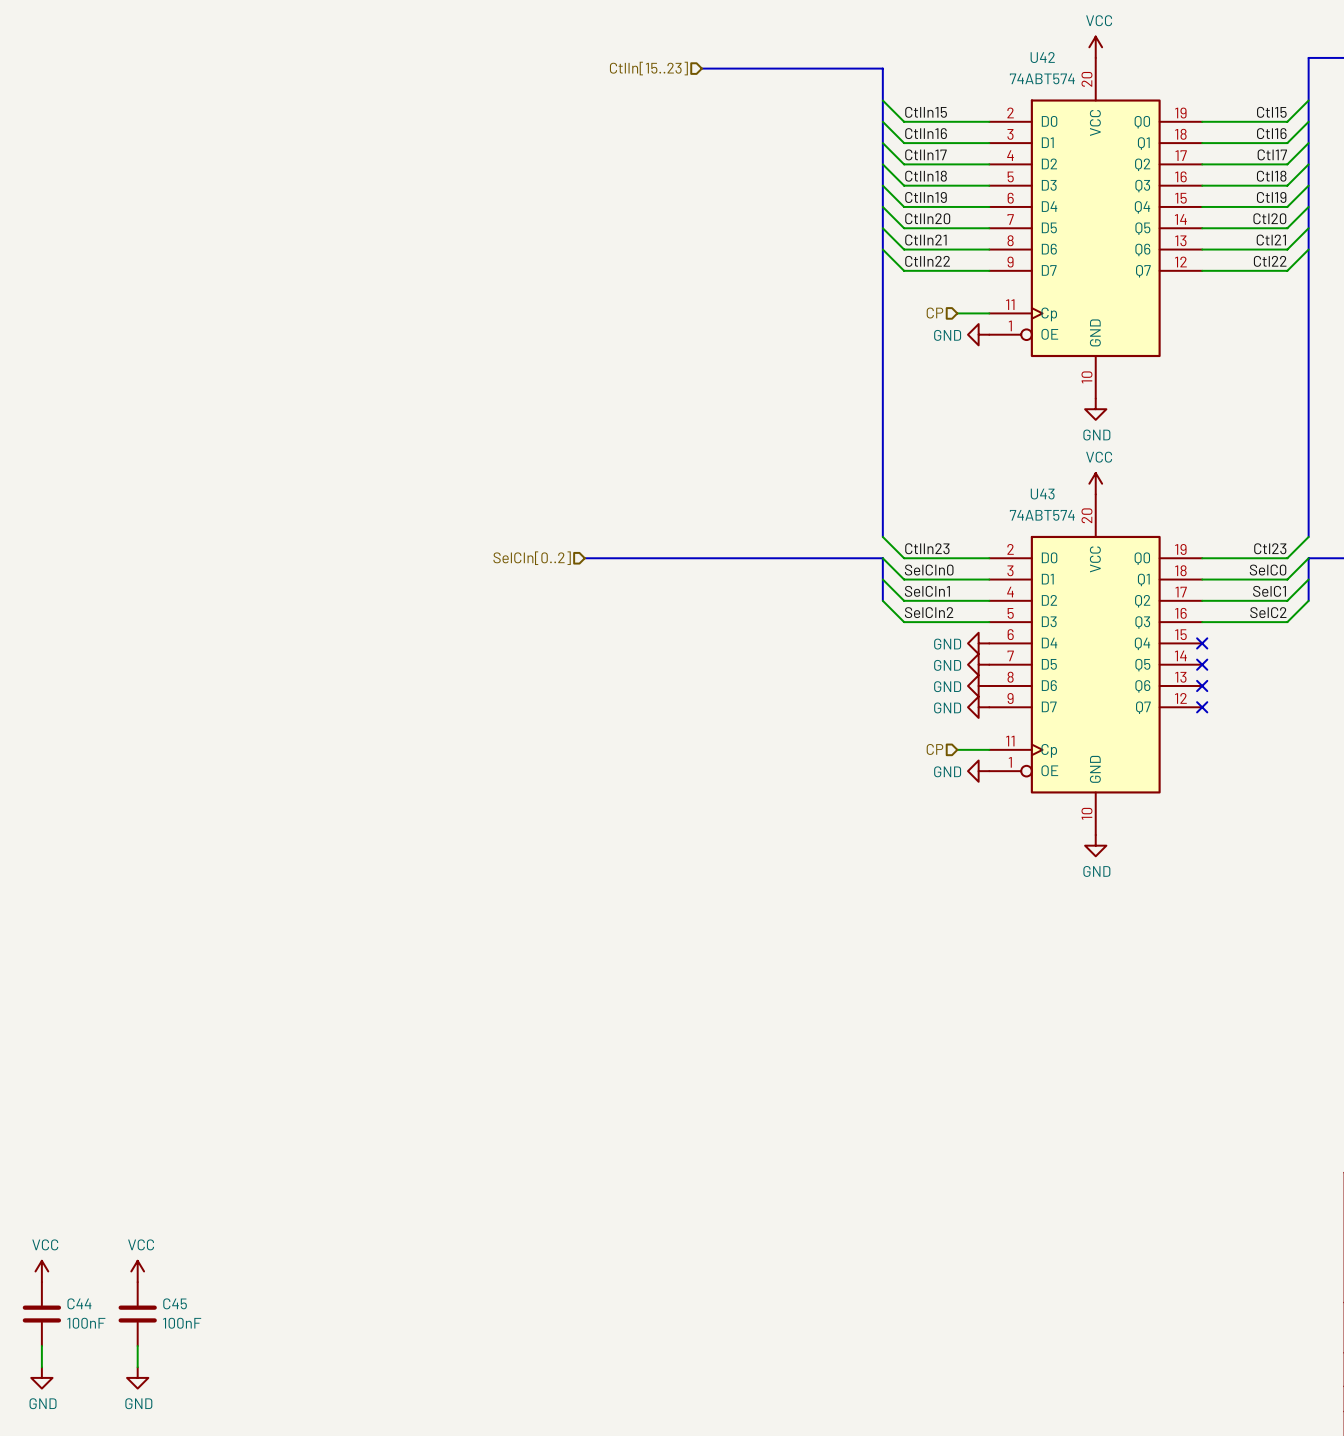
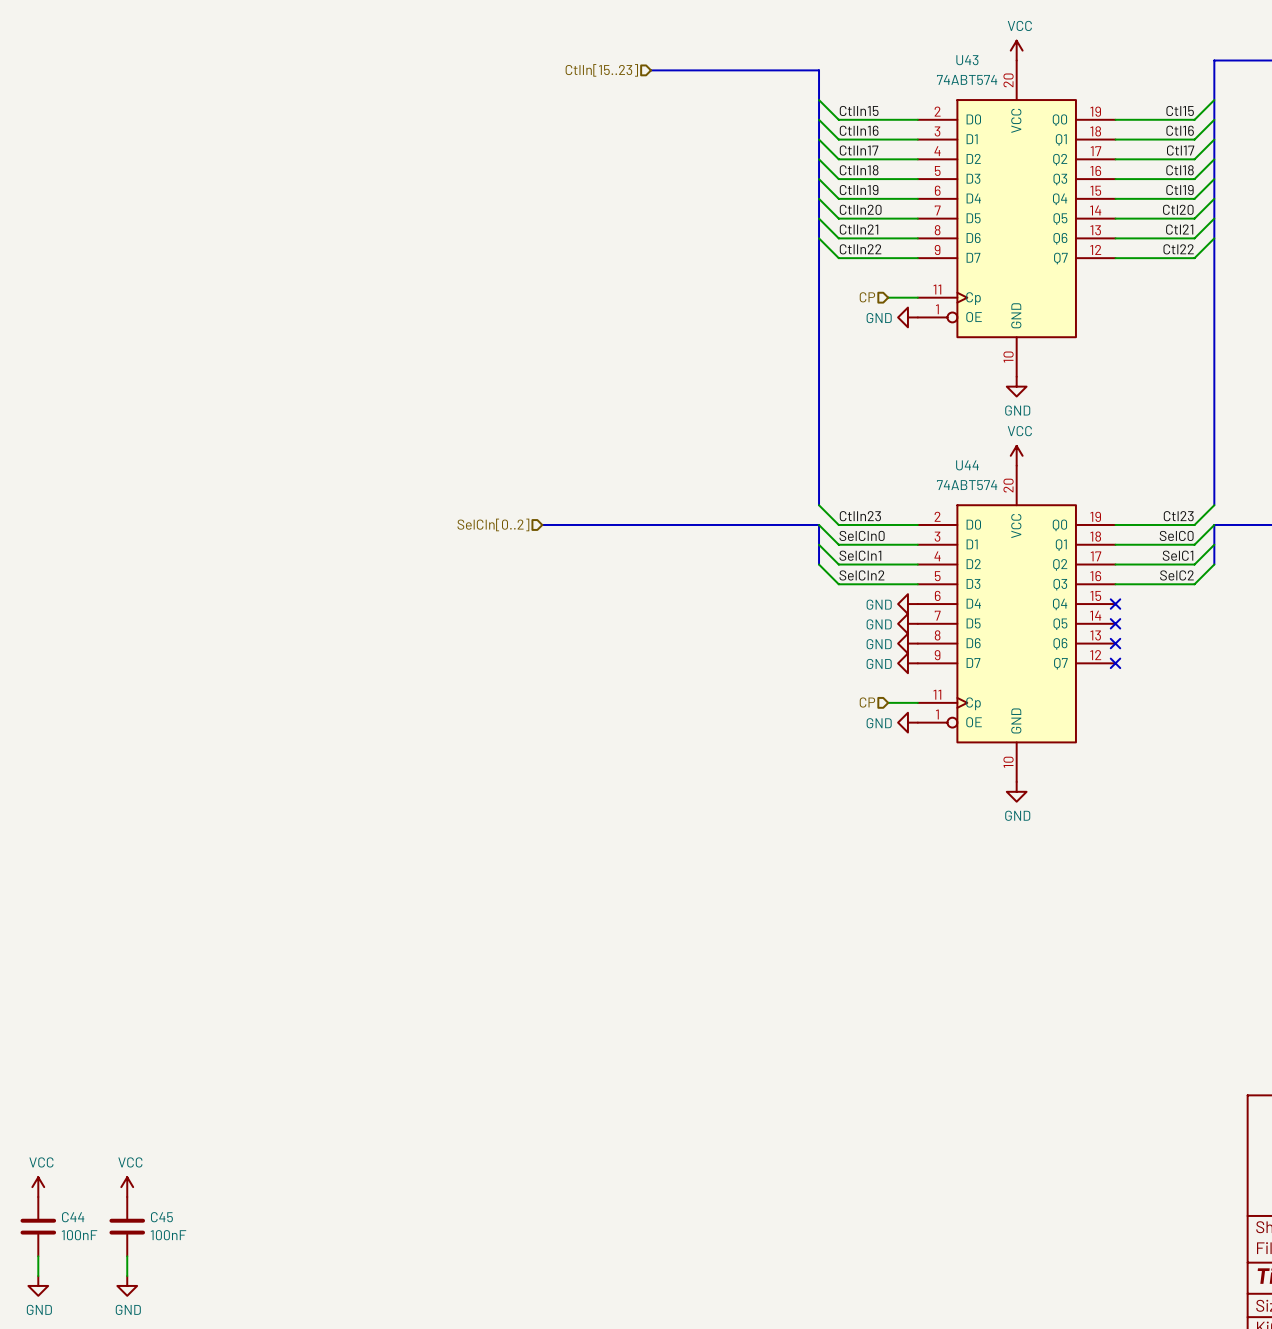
U42 name: U42 (1042, 57) -> U43 (967, 60)
U43 name: U43 (1042, 494) -> U44 (967, 465)

